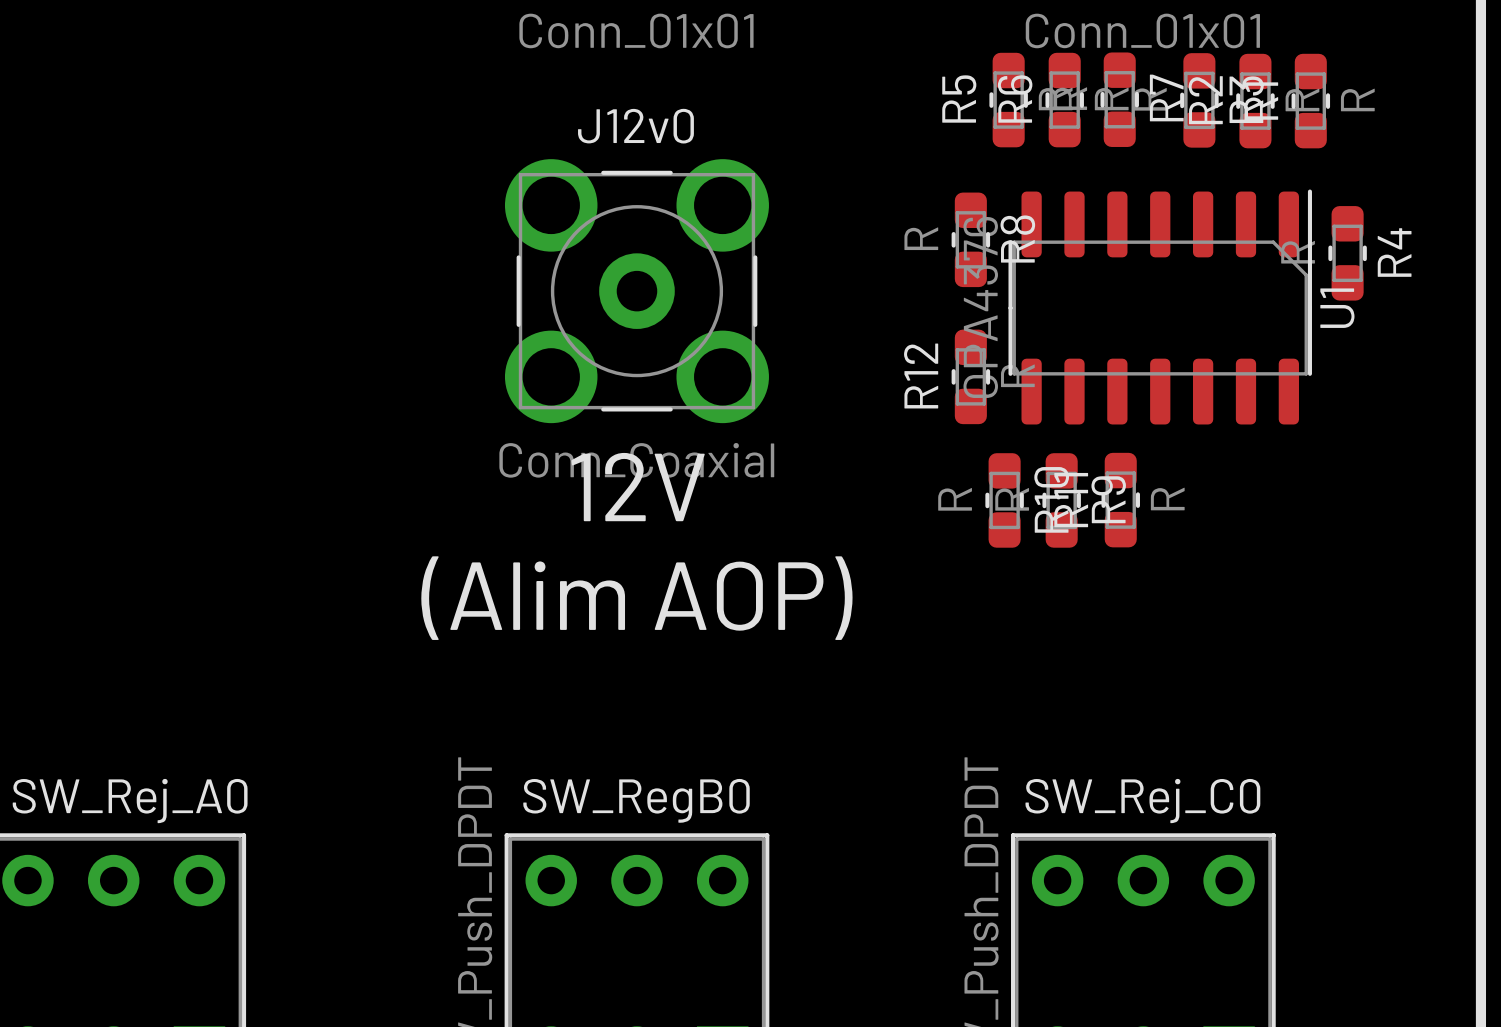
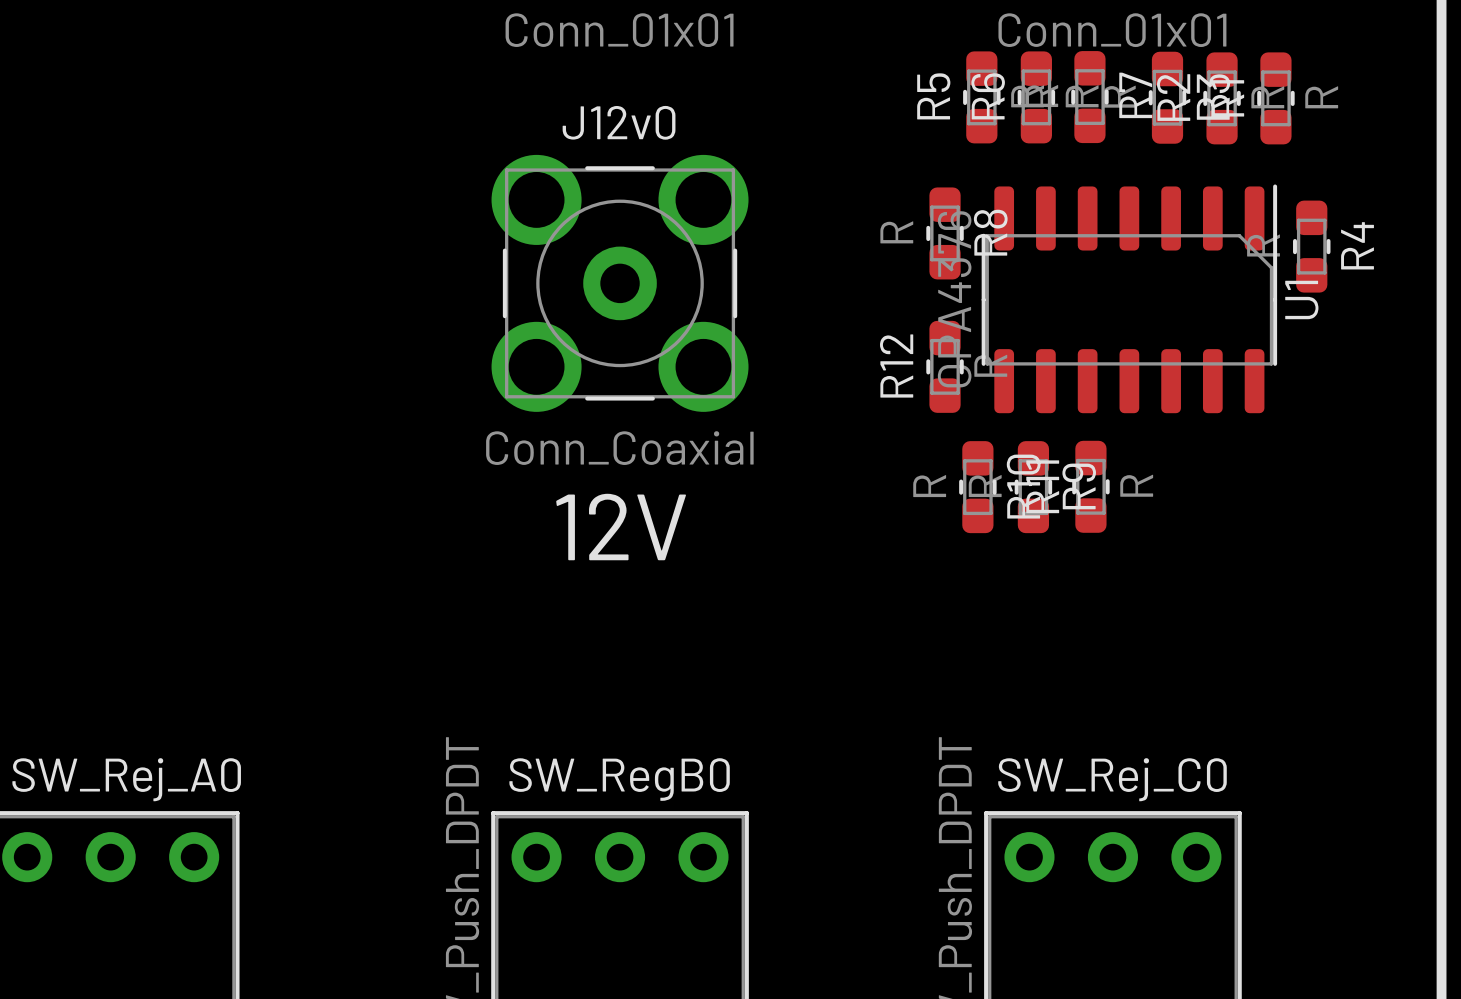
text position: 12V (638, 487) -> 12V (621, 527)
text: (Alim AOP) (636, 598) -> none

